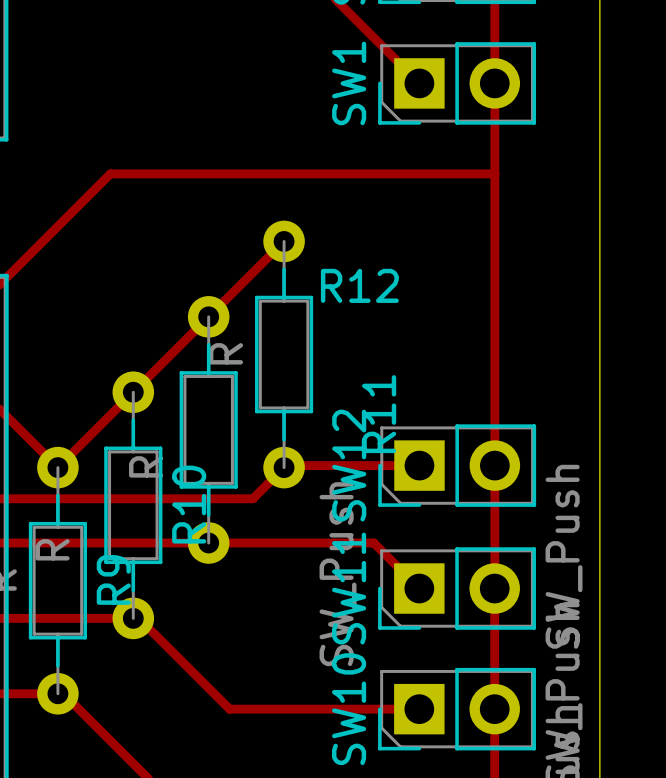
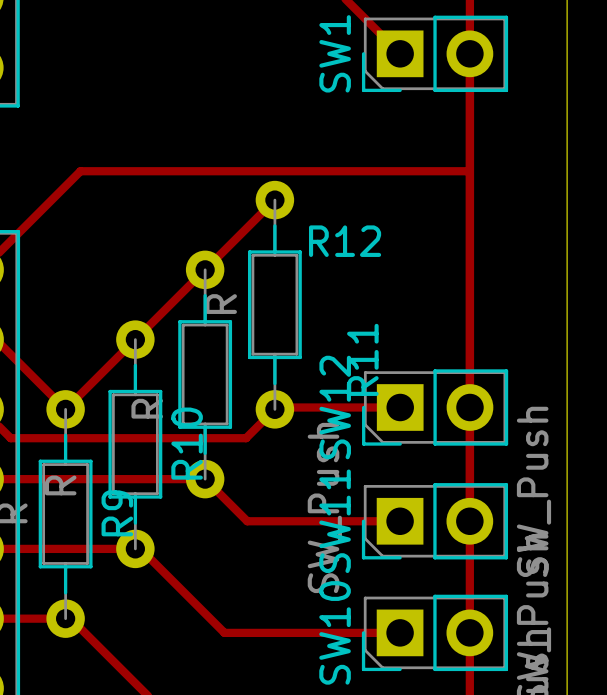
track: (494, 173) (110, 173) (74, 210) -> (469, 172) (80, 171)
track: (208, 543) (373, 543) (419, 588) -> (205, 479) (247, 521) (400, 521)

